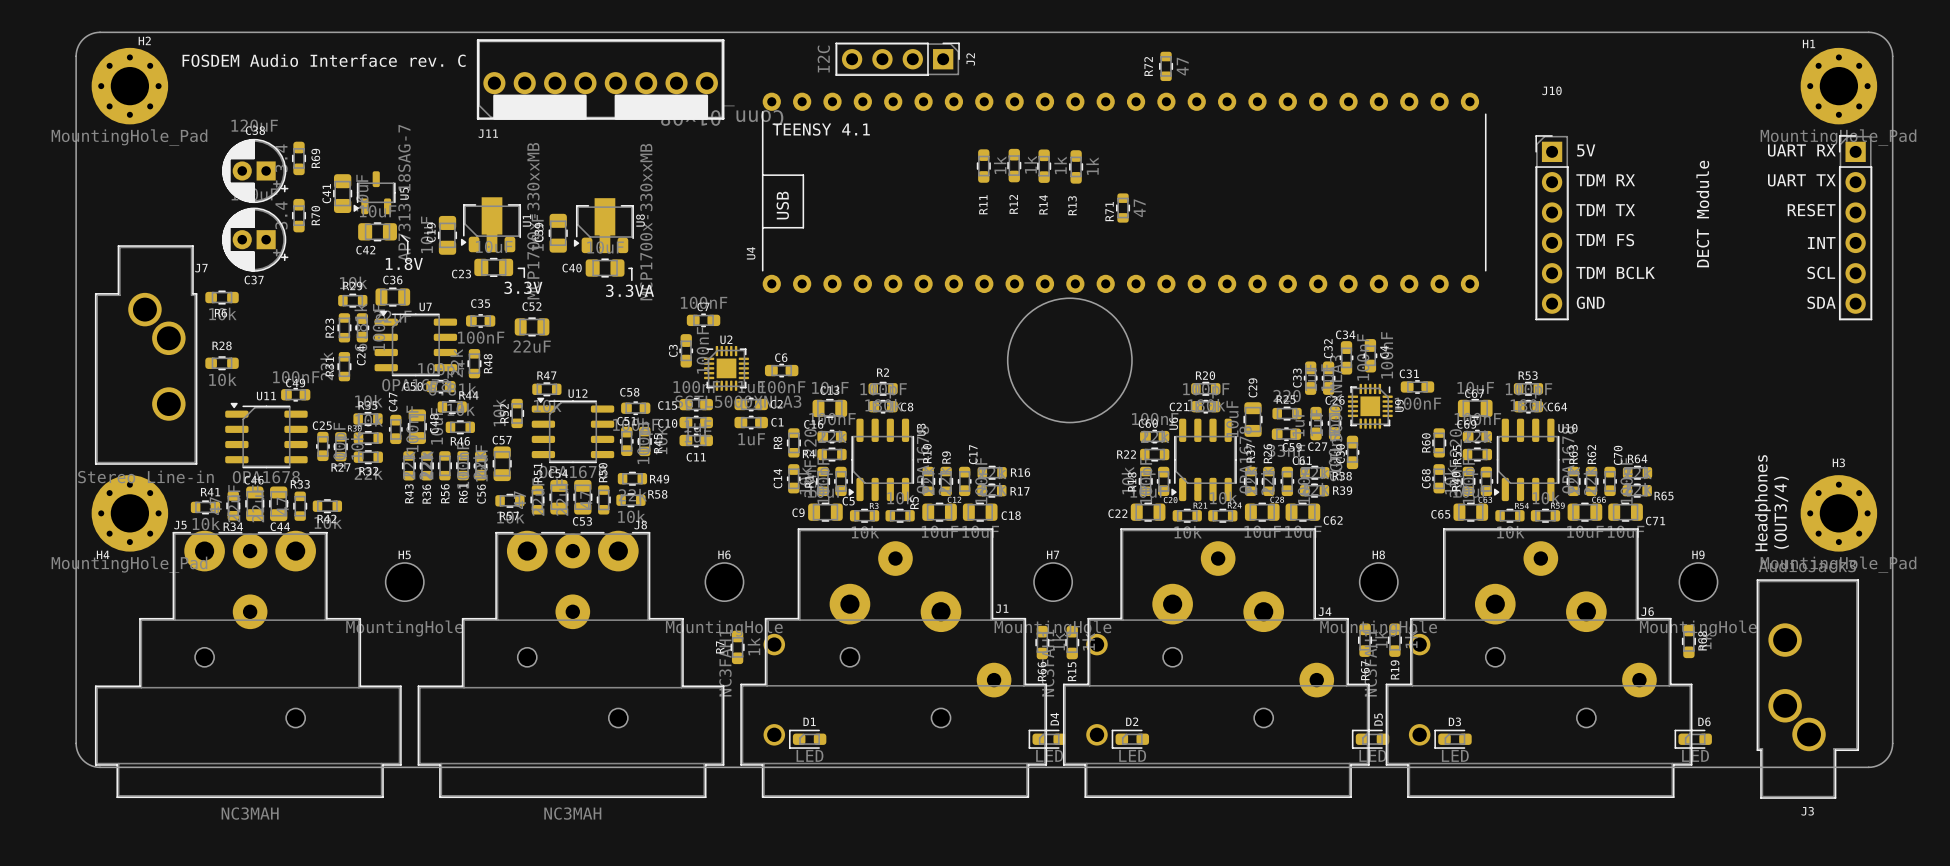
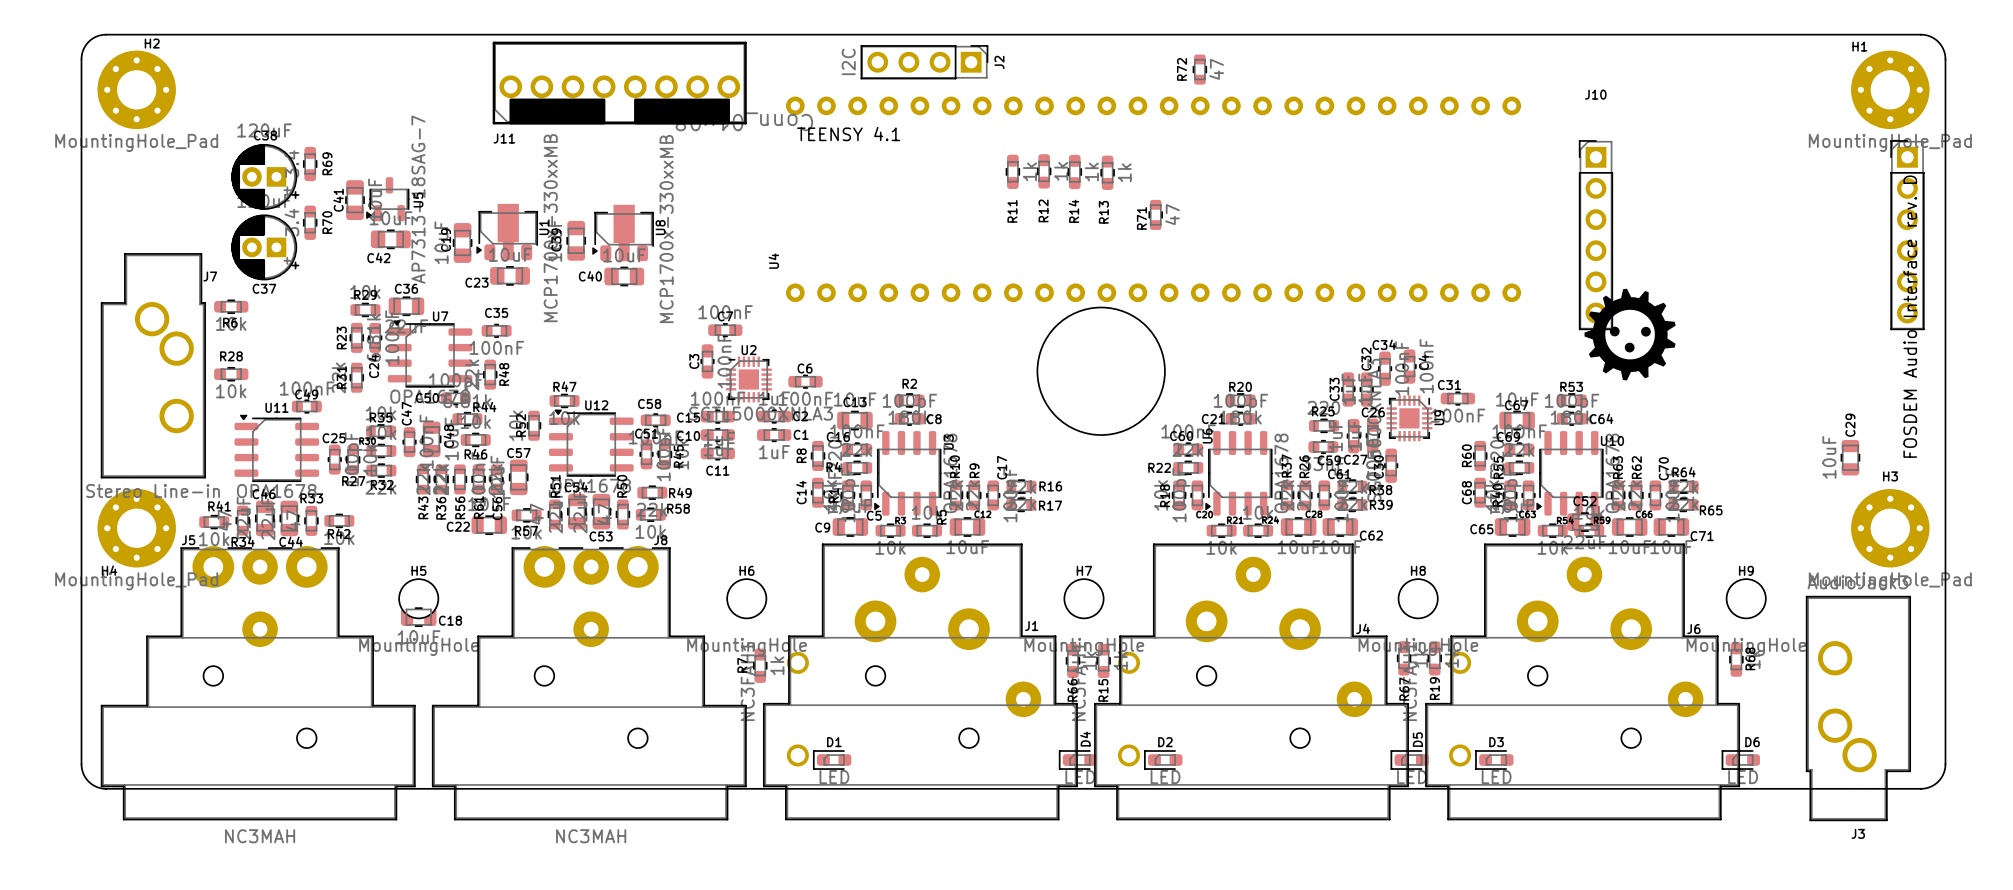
text: FOSDEM Audio Interface rev. C (324, 60) -> none
line: (762, 111) (762, 270) -> none
line: (1485, 114) (1485, 270) -> none
text: 5V (1586, 150) -> none
text: UART RX (1801, 150) -> none
line: (762, 175) (803, 175) (803, 227) (762, 227) -> none
text: TDM RX (1605, 180) -> none
text: UART TX (1801, 180) -> none
text: USB (782, 205) -> none
text: TDM TX (1605, 210) -> none
text: RESET (1811, 210) -> none
text: DECT Module (1702, 214) -> none
line: (401, 235) (407, 241) (407, 253) -> none
text: TDM FS (1605, 240) -> none
text: INT (1821, 243) -> none
text: 1.8V (404, 263) -> none
line: (518, 268) (524, 268) (524, 277) -> none
line: (628, 268) (631, 268) (631, 280) -> none
text: TDM BCLK (1615, 272) -> none
text: SCL (1821, 272) -> none
drawing: none -> [1584, 288, 1676, 381]
text: 3.3V (523, 287) -> none
text: 3.3VA (630, 290) -> none
text: GND (1590, 302) -> none
text: SDA (1821, 302) -> none
text: none -> FOSDEM Audio Interface rev. D (1910, 316)
C52 position: (532, 326) -> (1584, 522)
C29 position: (1253, 419) -> (1850, 457)
text: Headphones (1762, 503) -> none
C18 position: (980, 512) -> (418, 617)
C22 position: (1148, 512) -> (489, 525)
text: (OUT3/4) (1781, 512) -> none

